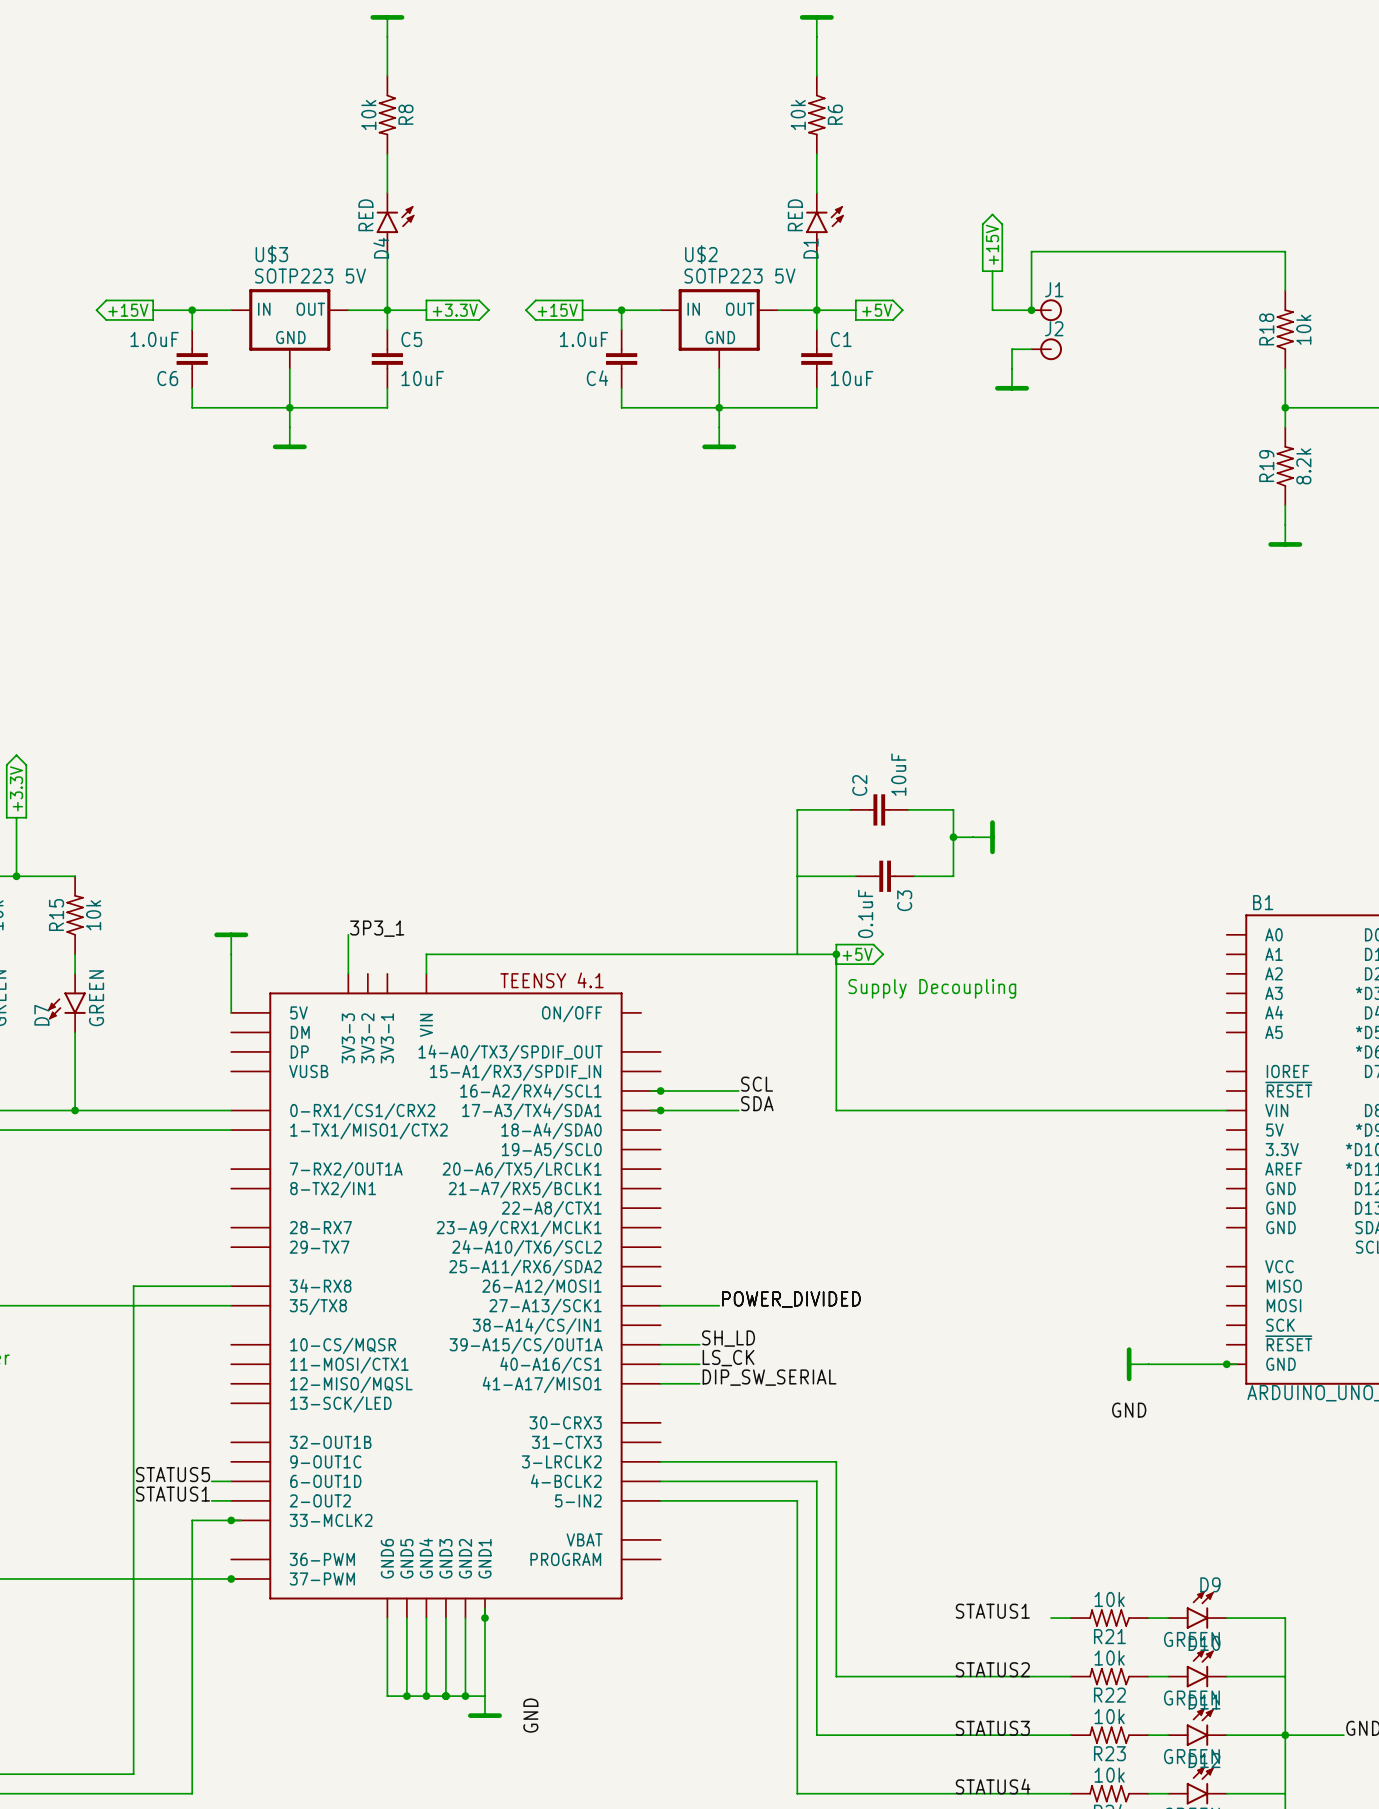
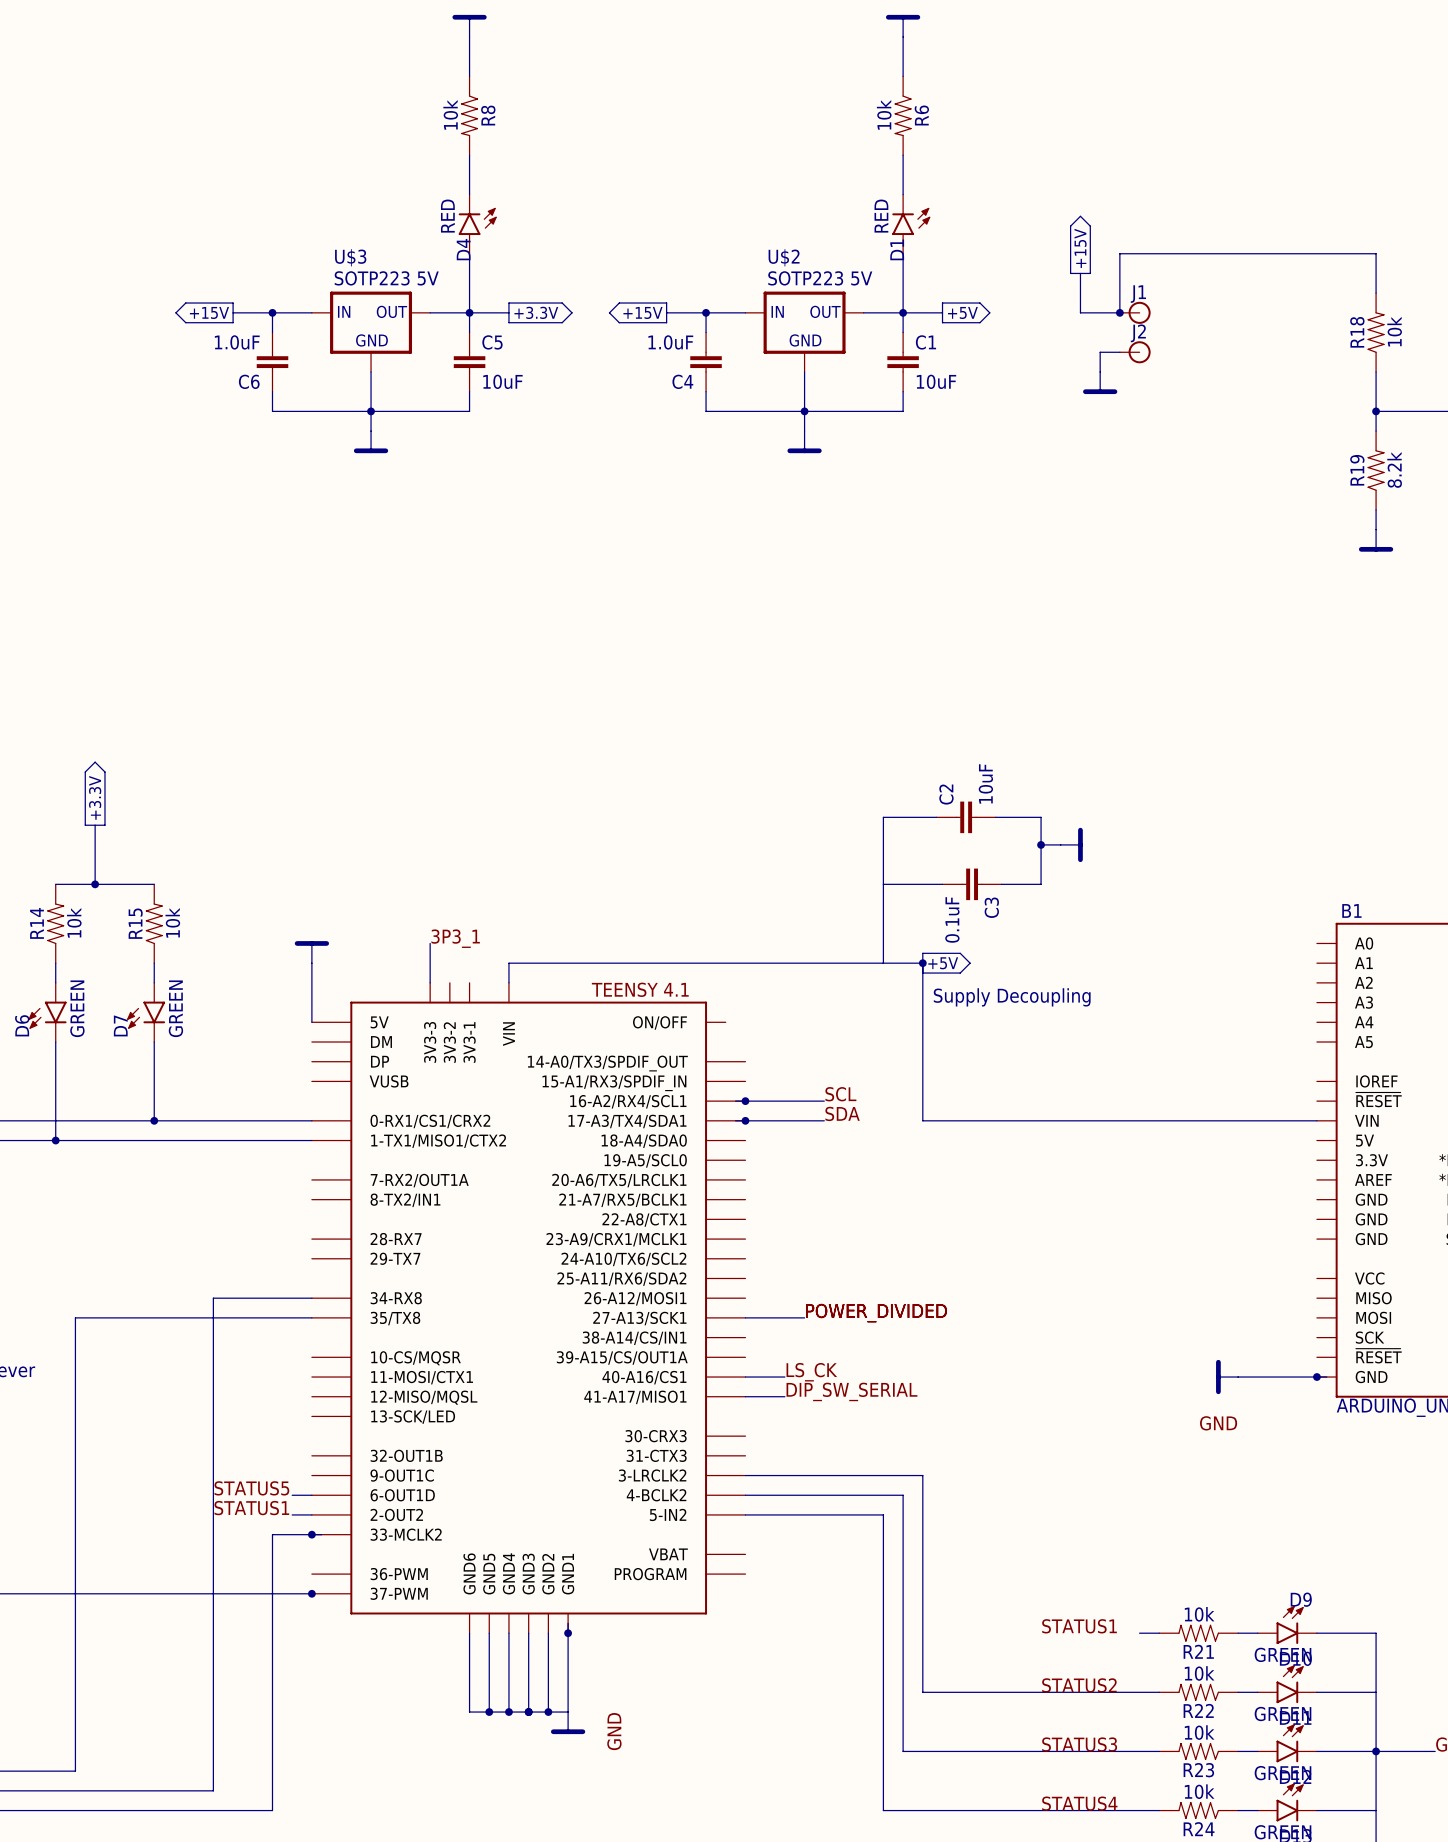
label: SH_LD (728, 1338) -> none
wire: (660, 1344) (699, 1344) -> none

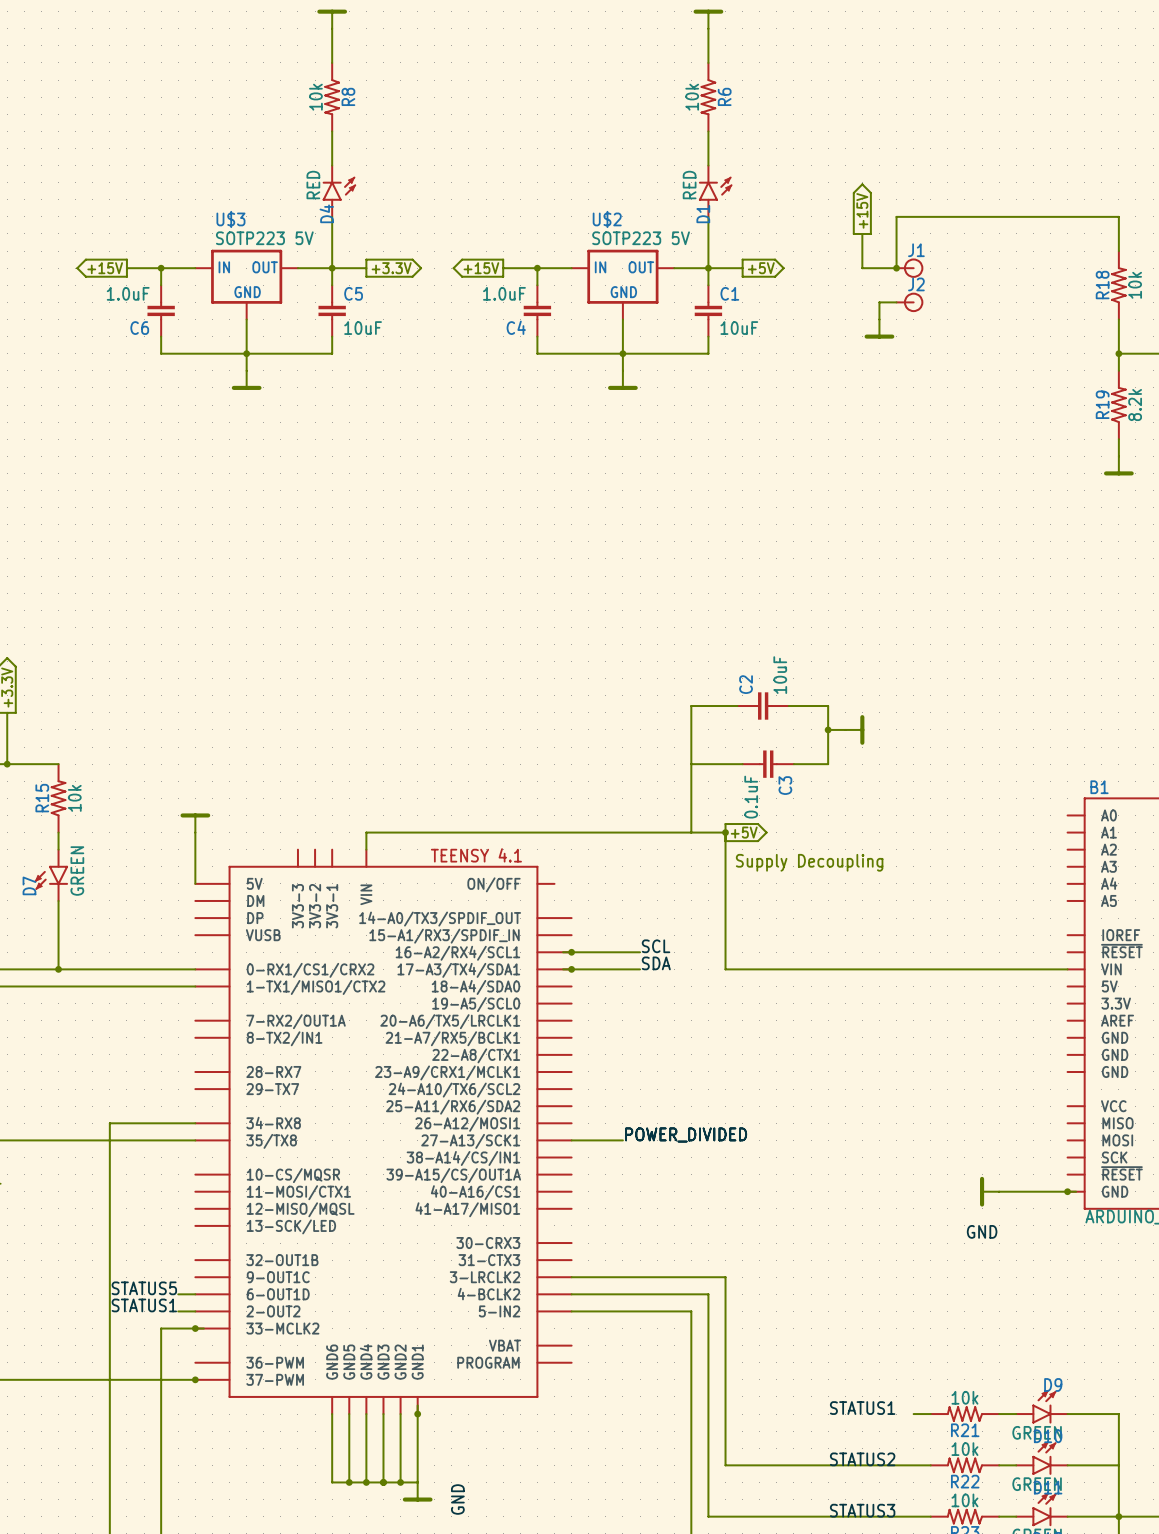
label: 3P3_1 (455, 938) -> none
wire: (430, 943) (430, 982) -> none
label: LS_CK (811, 1372) -> none
wire: (745, 1377) (784, 1377) -> none
label: DIP_SW_SERIAL (851, 1391) -> none
wire: (745, 1396) (784, 1396) -> none

